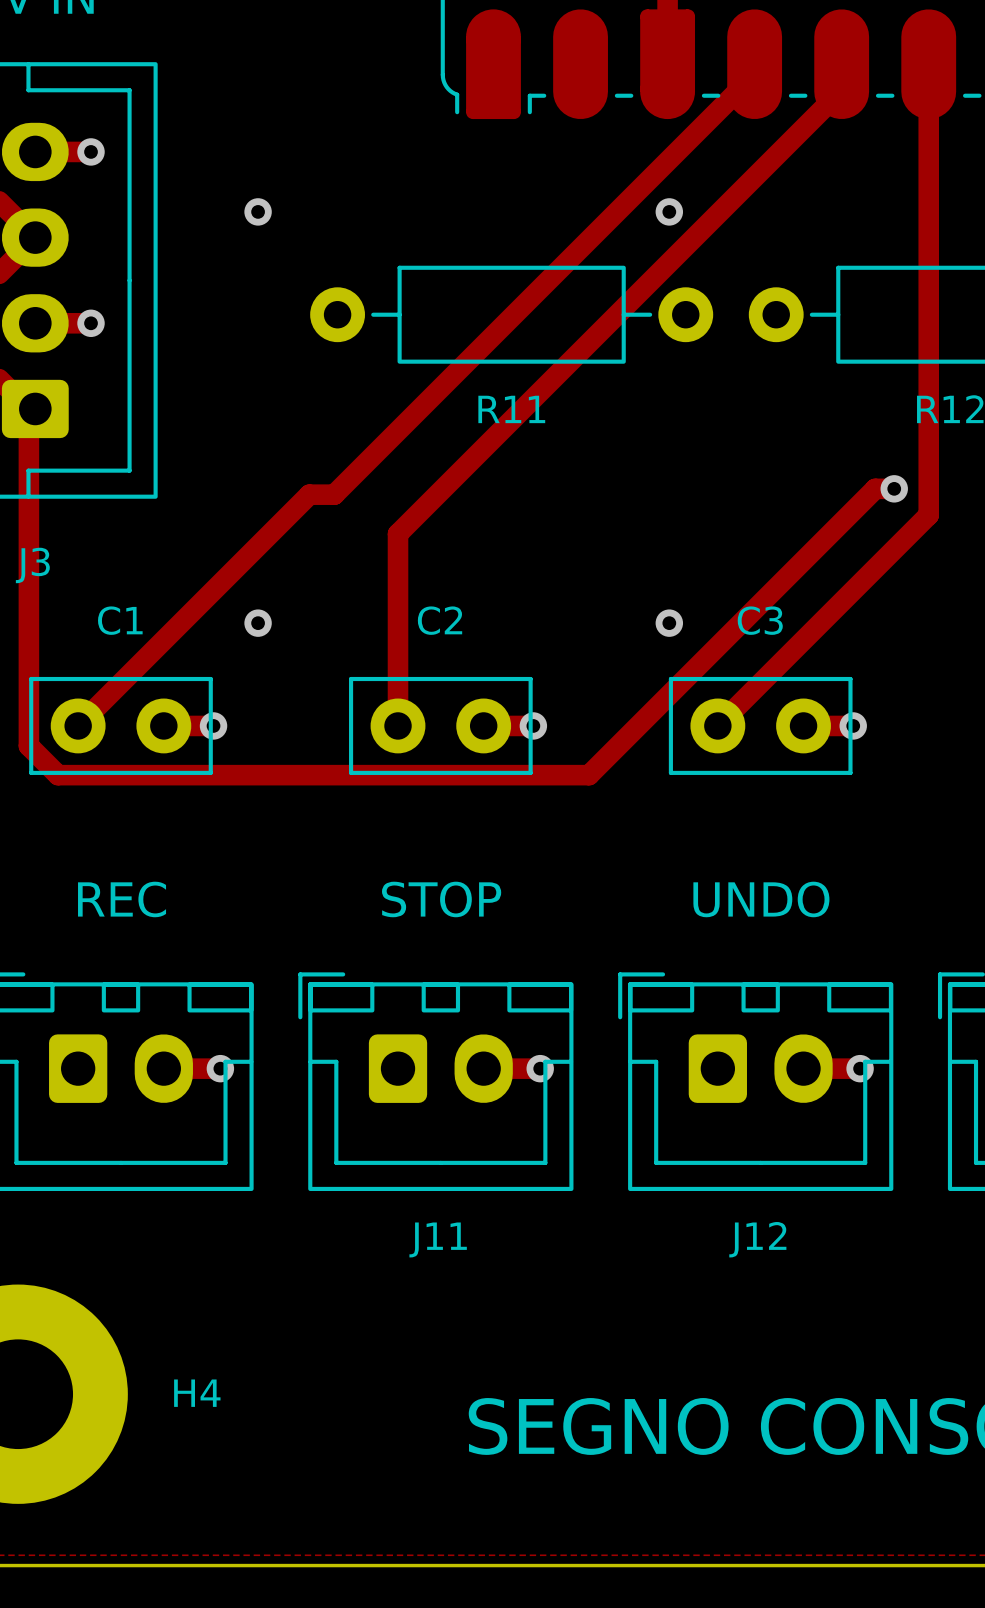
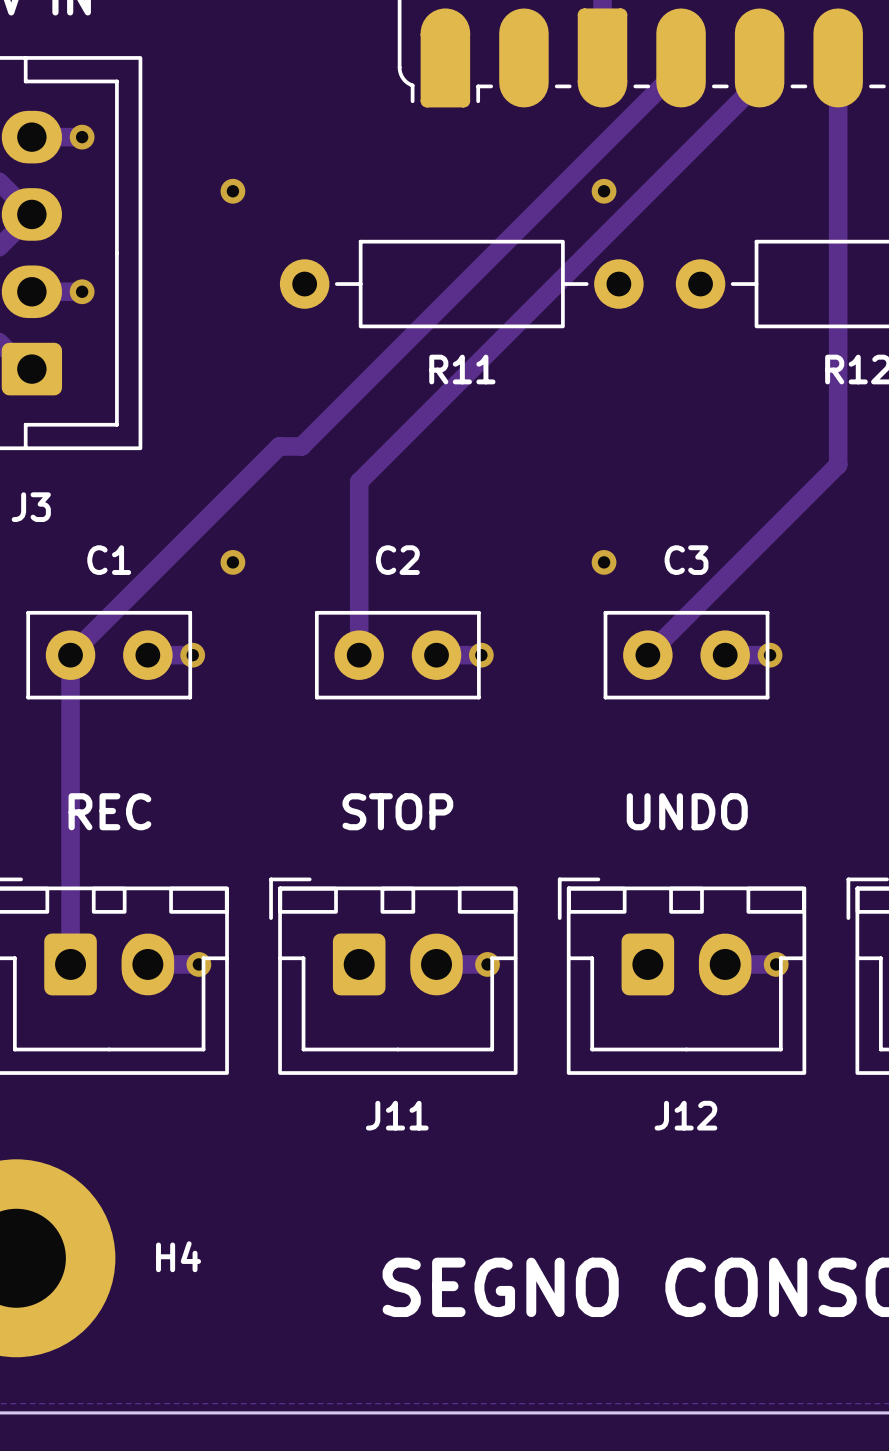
track: (28, 408) (28, 745) (58, 775) (589, 775) (875, 488) (894, 488) -> none
via: (894, 488) -> none
track: none -> (70, 655) (70, 964)

